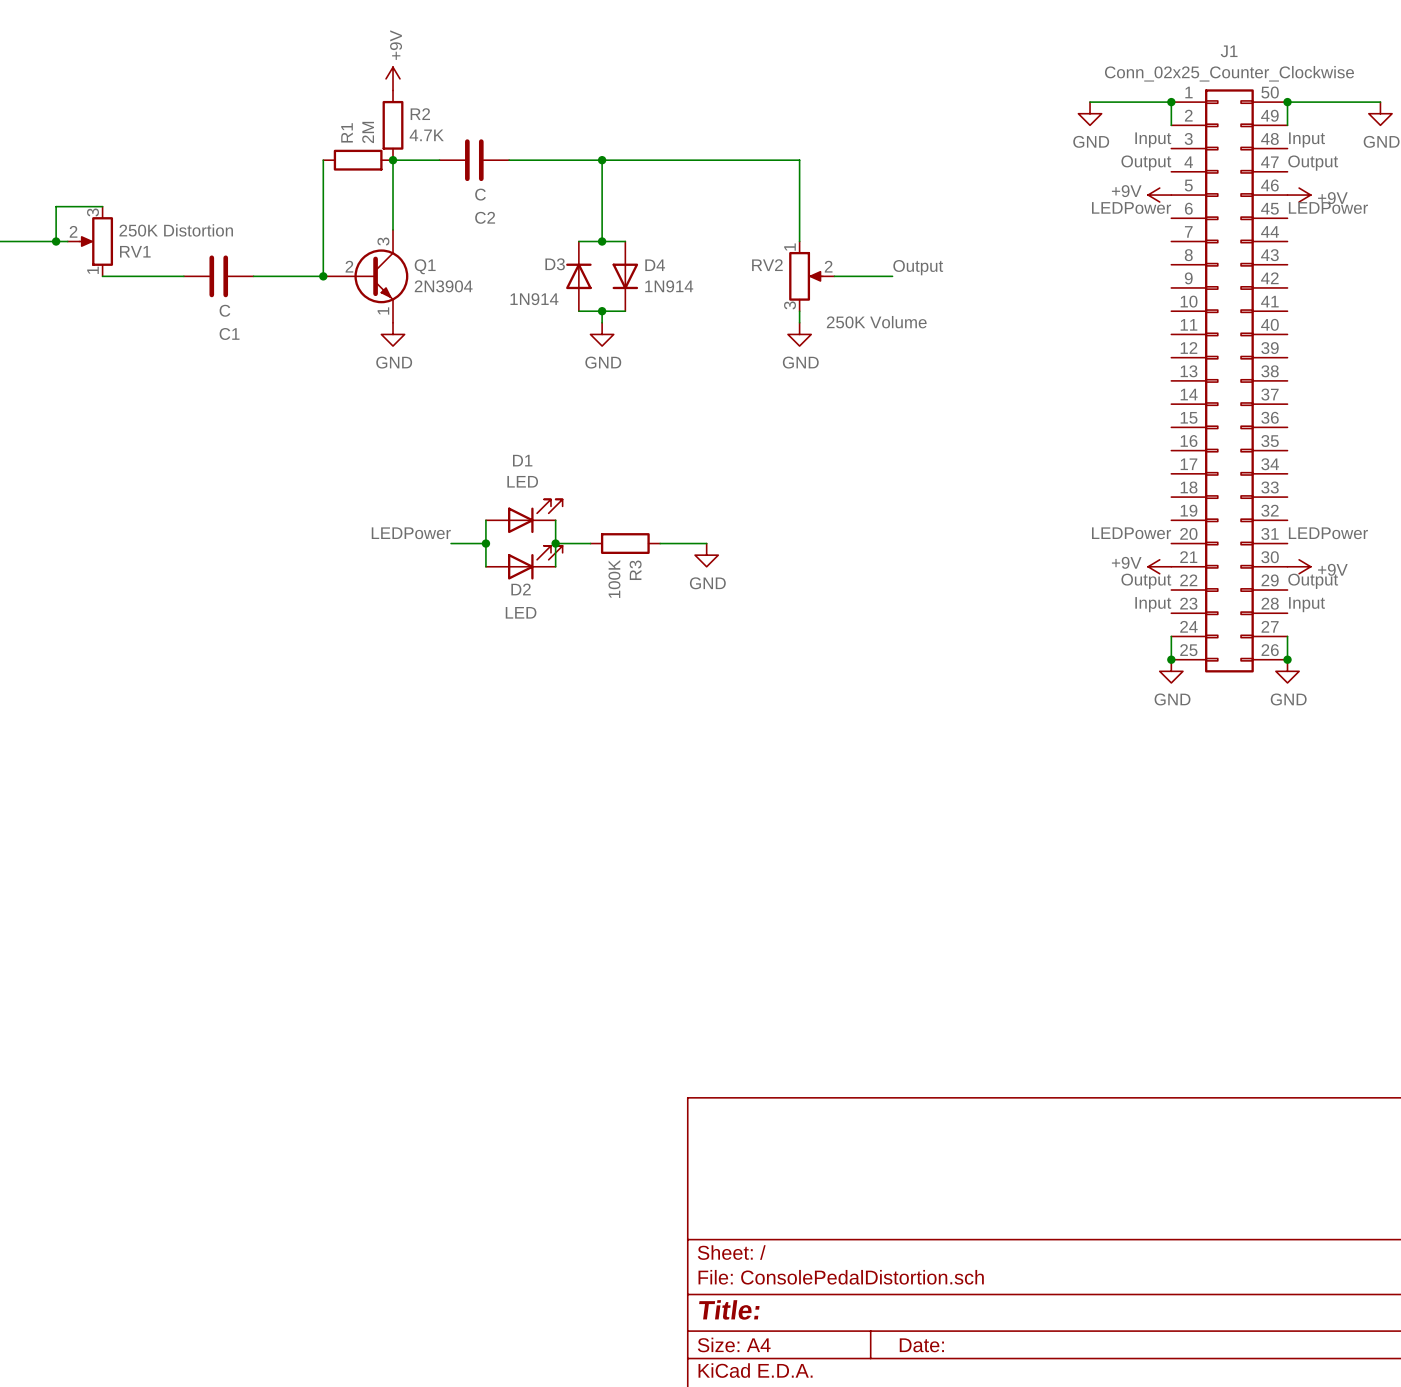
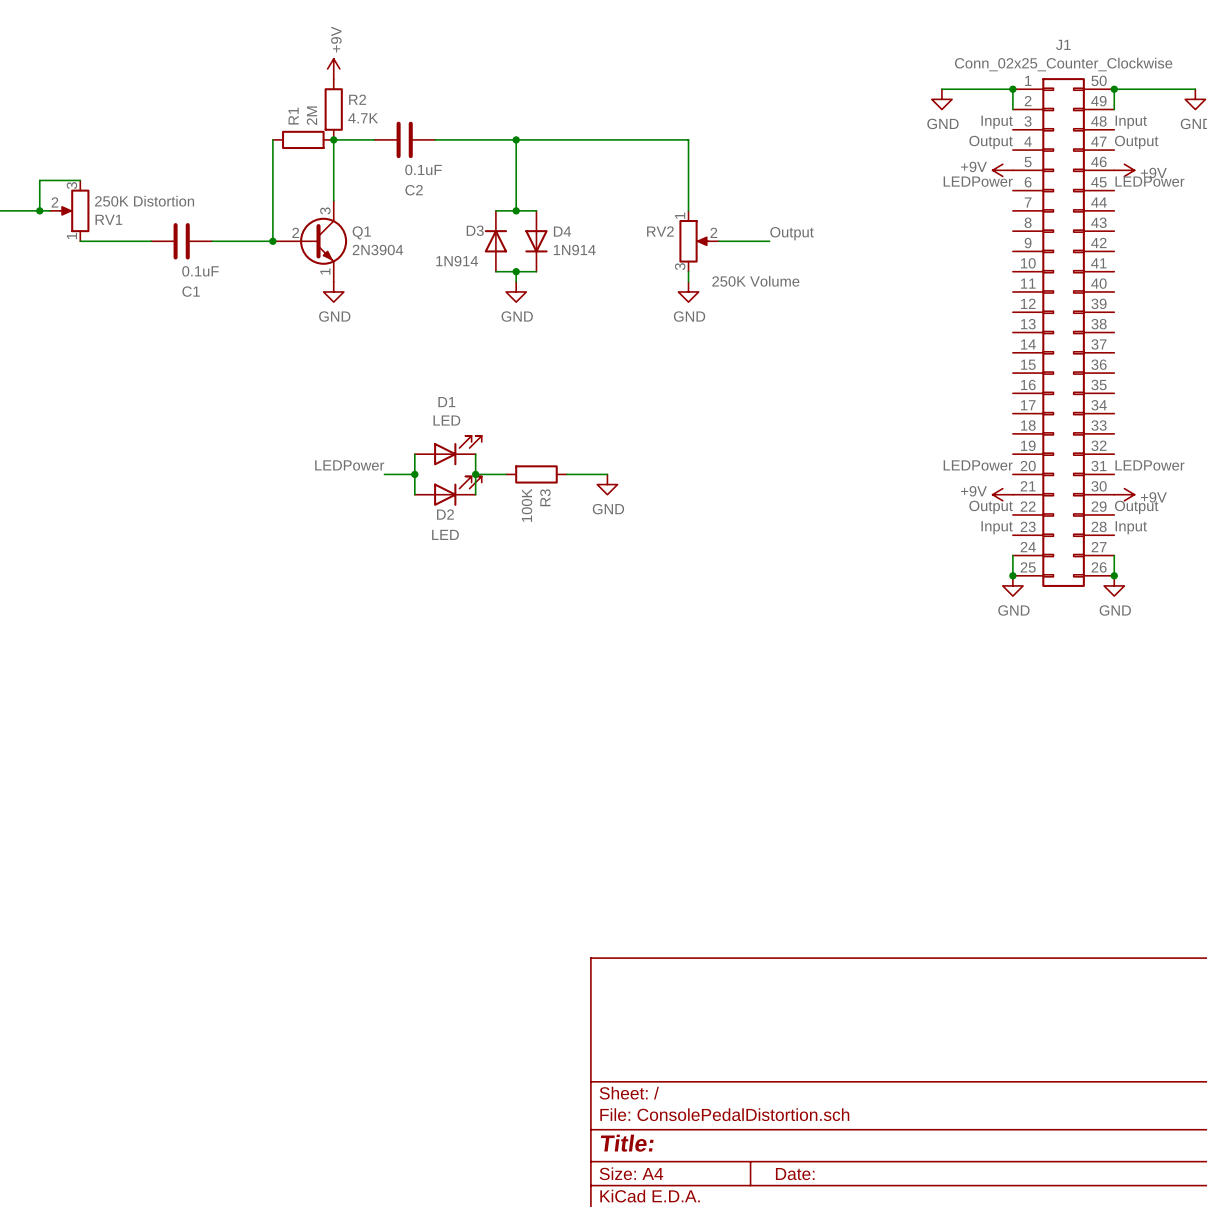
C2 value: C (480, 194) -> 0.1uF (423, 169)
C1 value: C (224, 310) -> 0.1uF (200, 271)

